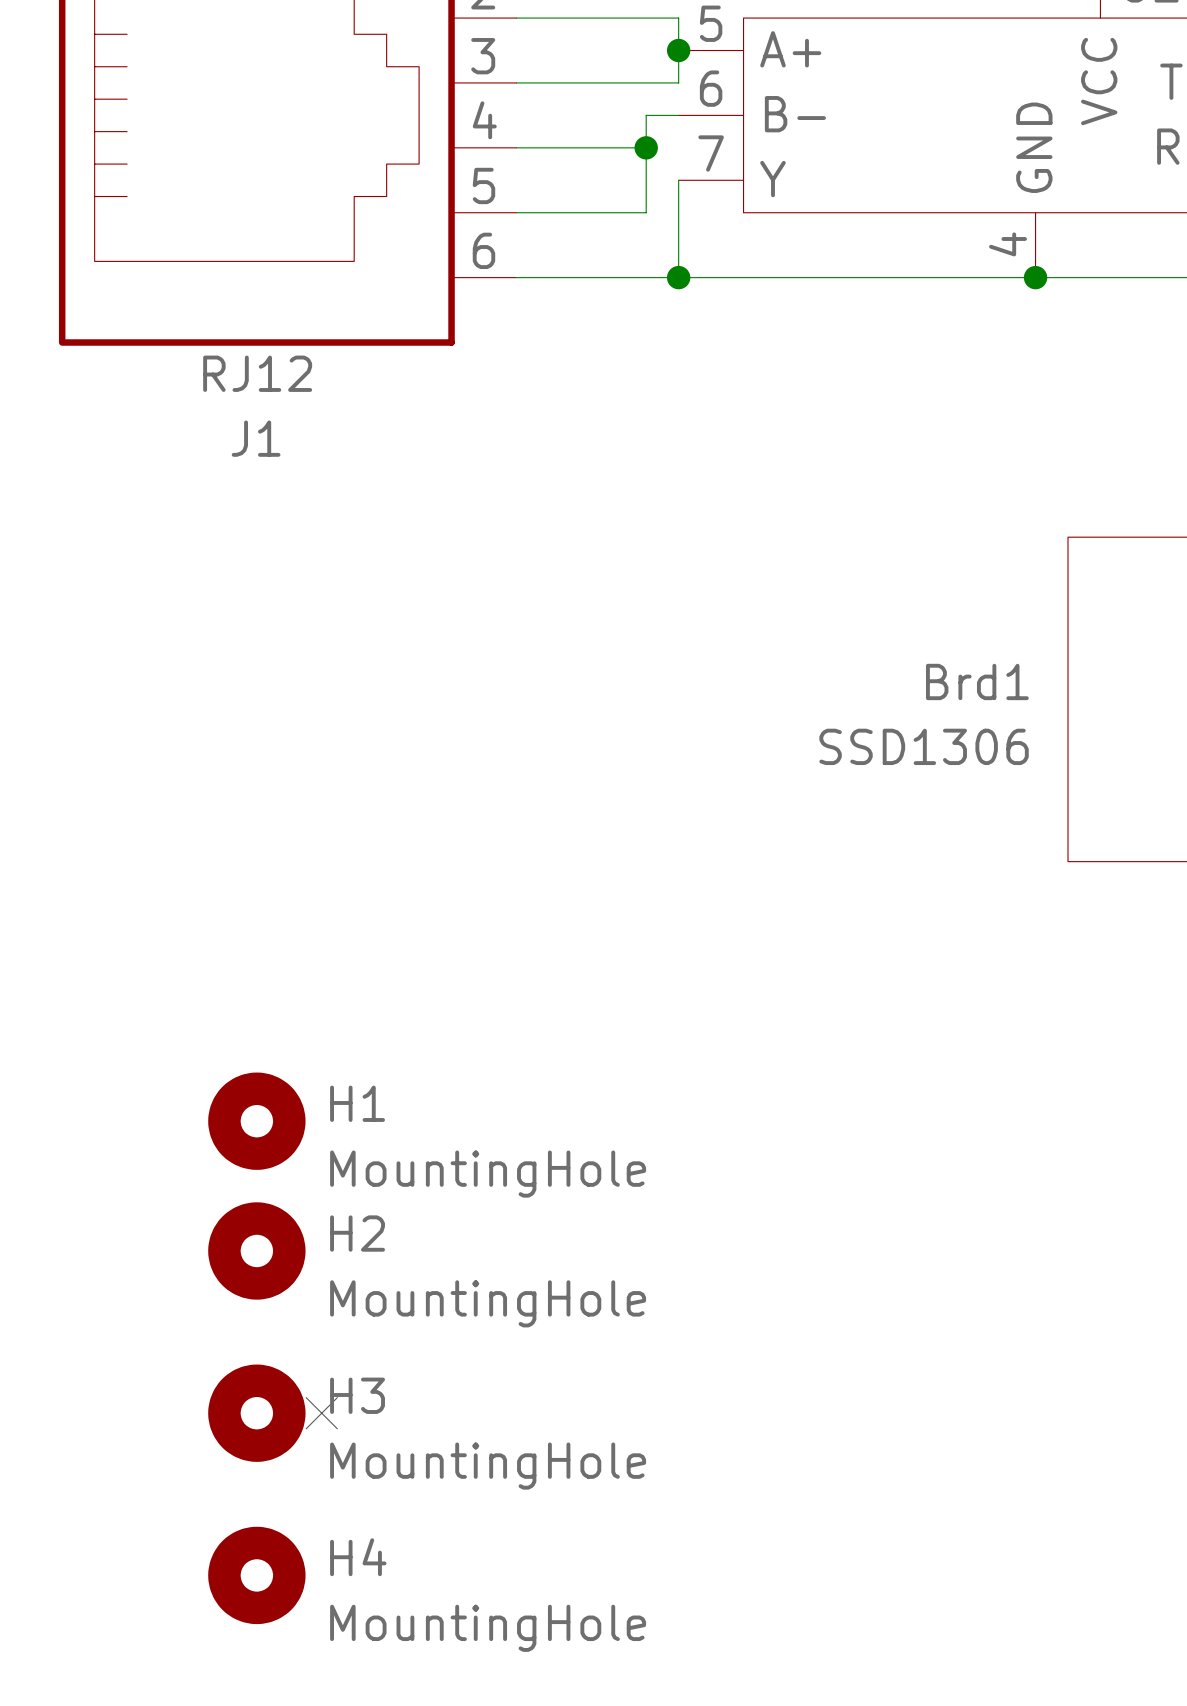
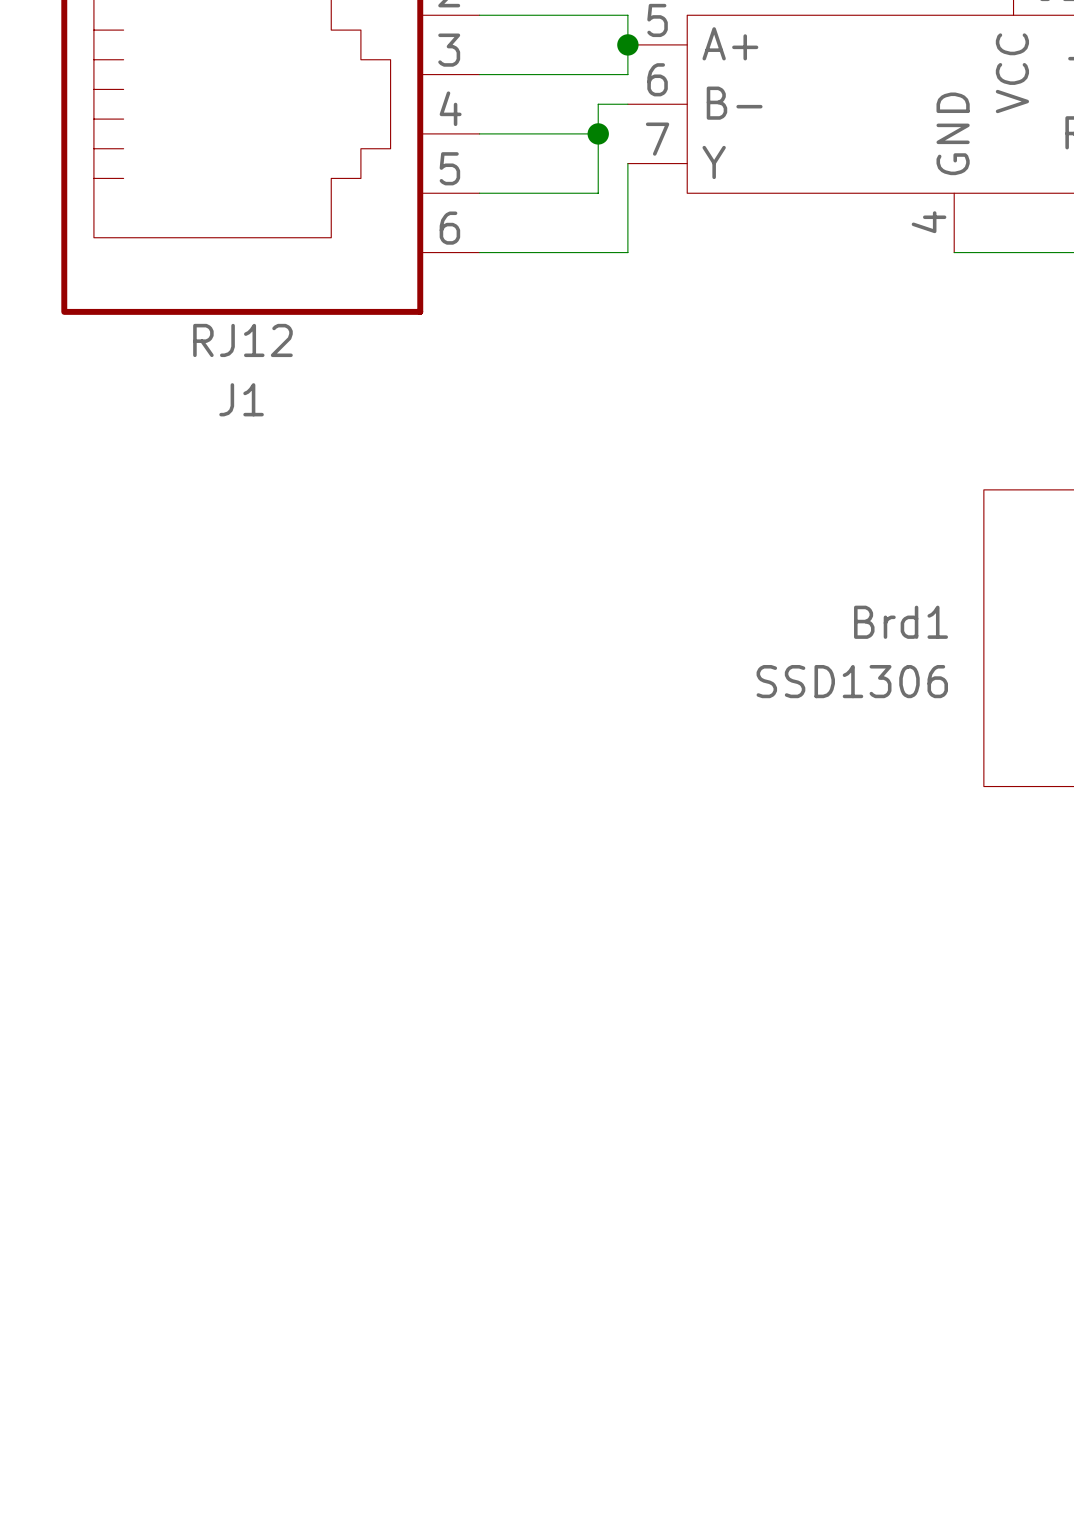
wire: (678, 277) (1035, 277) -> none
junction: (678, 277) -> none
junction: (1035, 277) -> none
H1: MountingHole (256, 1121) -> none
H2: MountingHole (256, 1250) -> none
H3: MountingHole (256, 1413) -> none
no-connect mark: (321, 1413) -> none
H4: MountingHole (256, 1575) -> none

